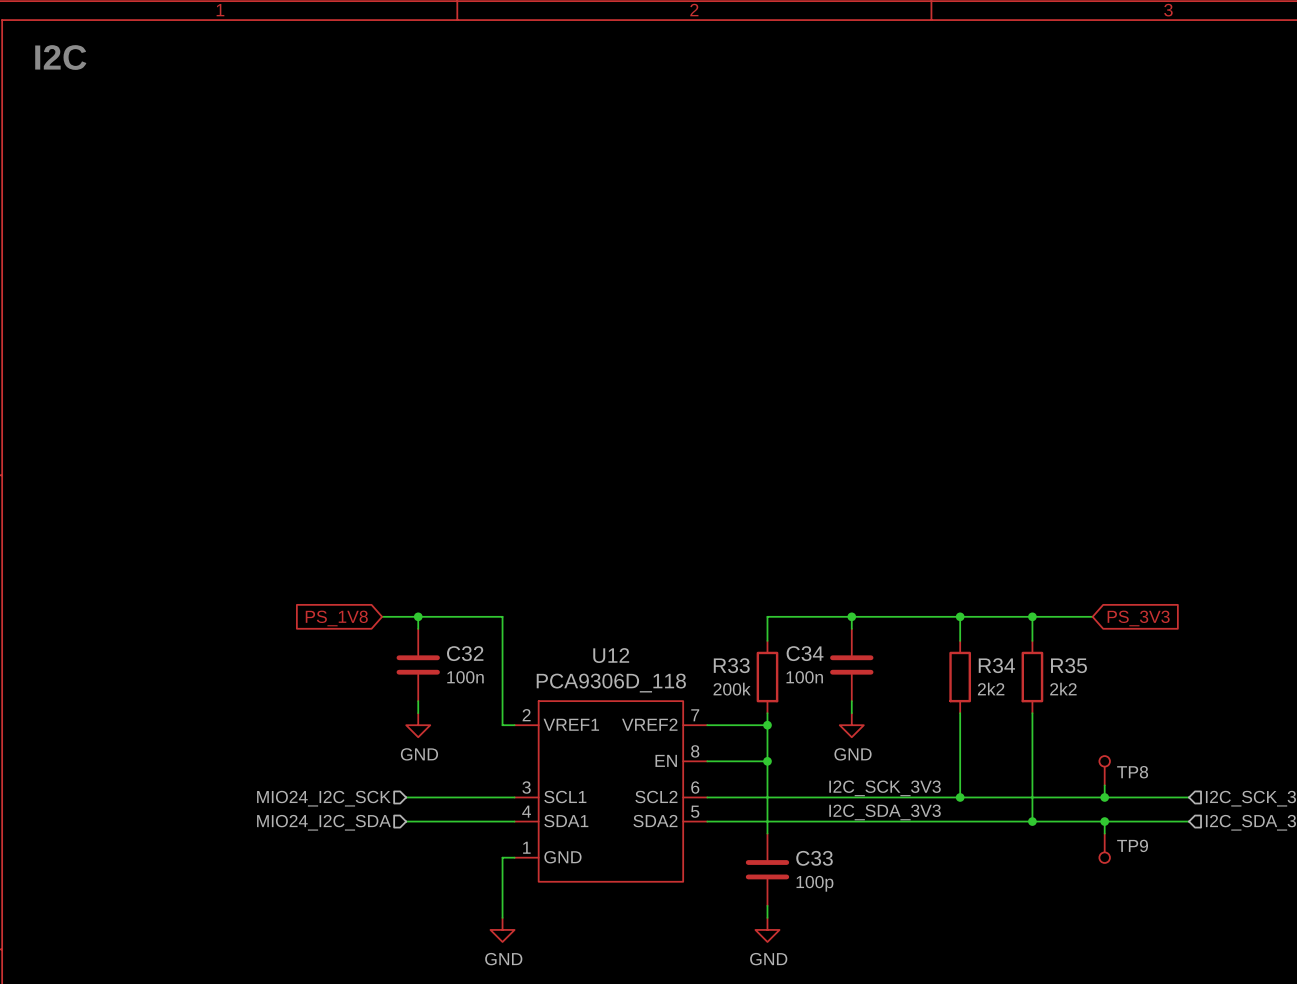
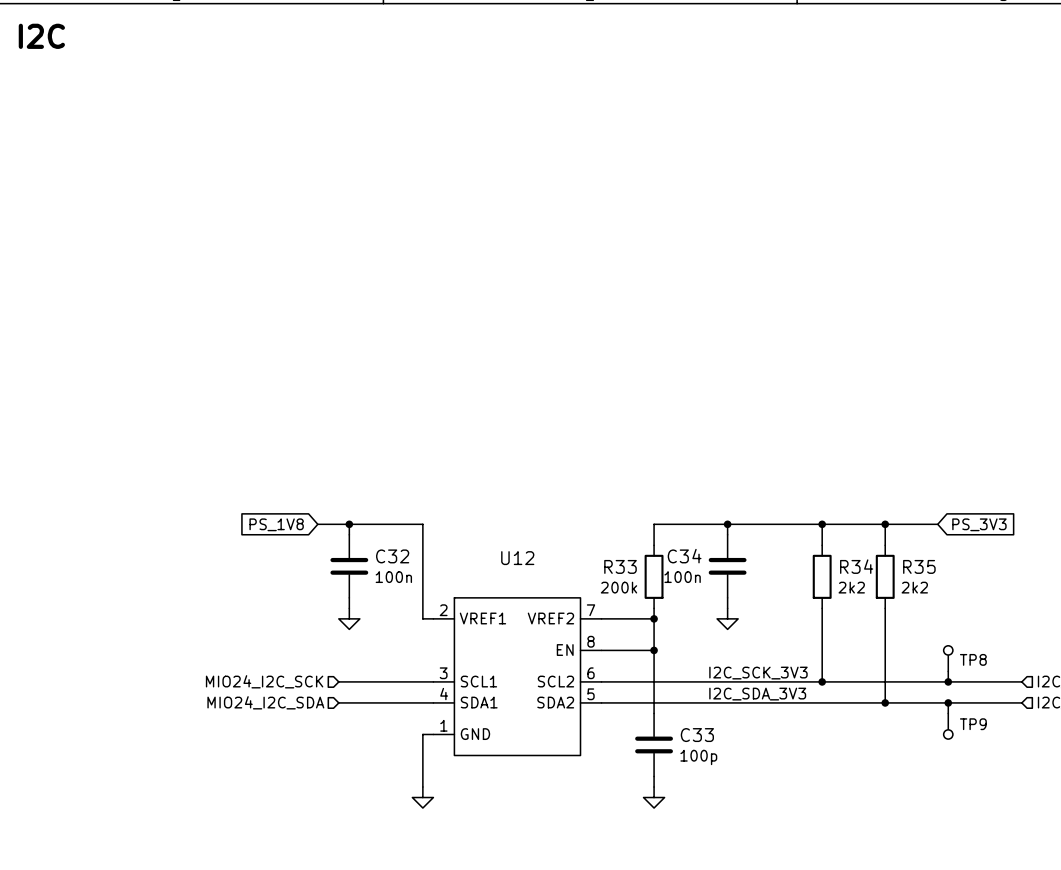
U12 value: PCA9306D_118 (611, 683) -> none
power symbol text: GND (419, 754) -> none
power symbol text: GND (853, 754) -> none
power symbol text: GND (503, 959) -> none
power symbol text: GND (768, 959) -> none

